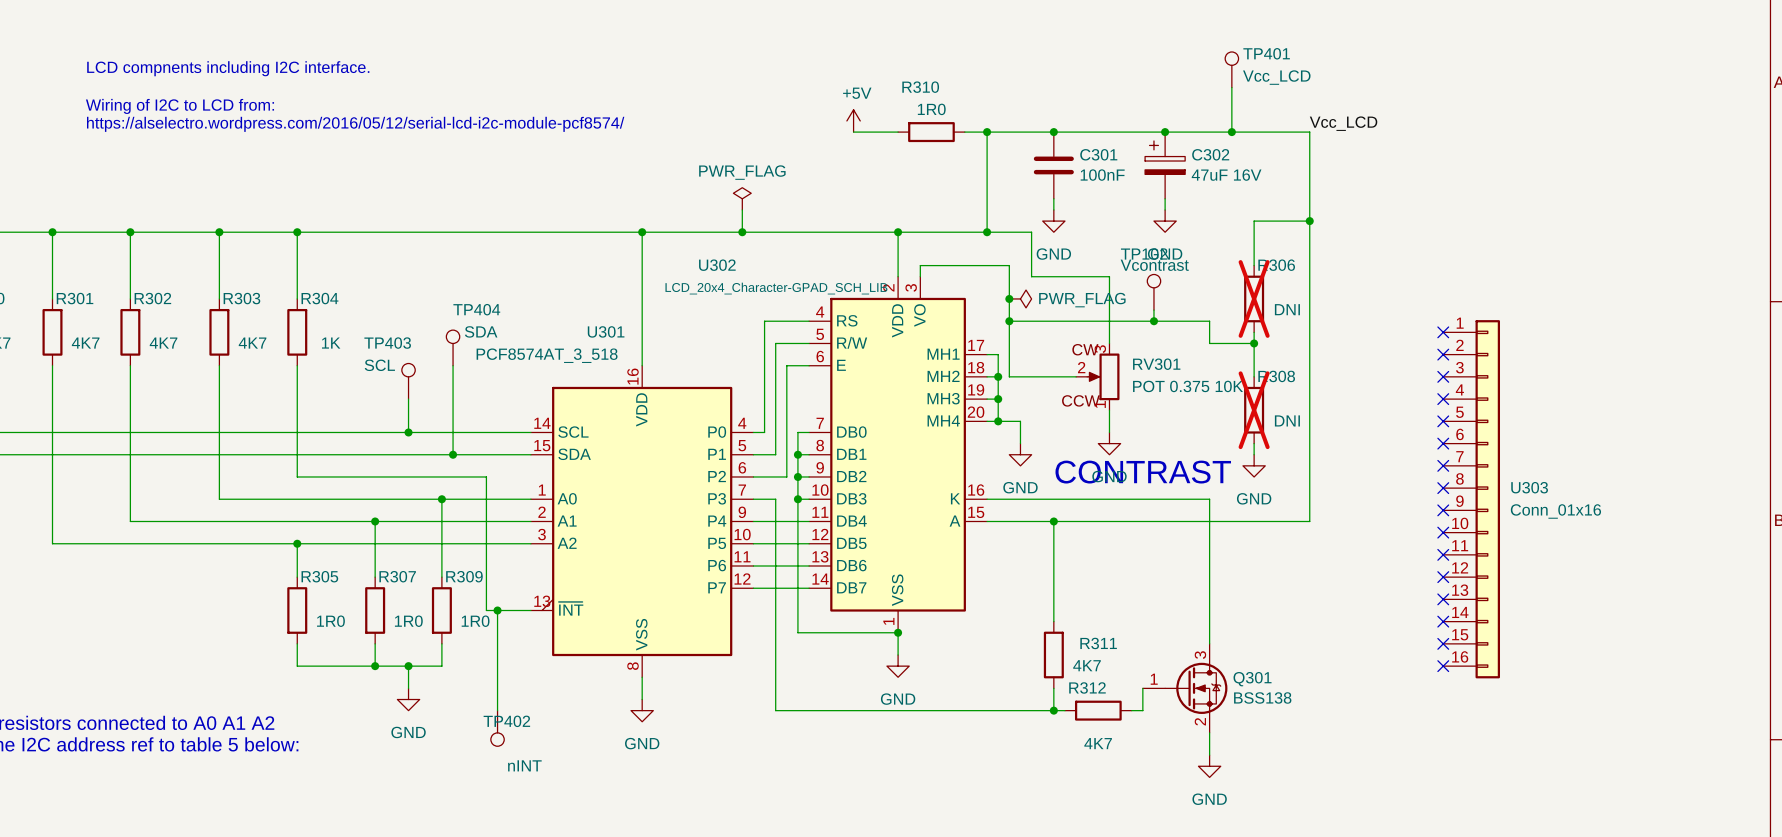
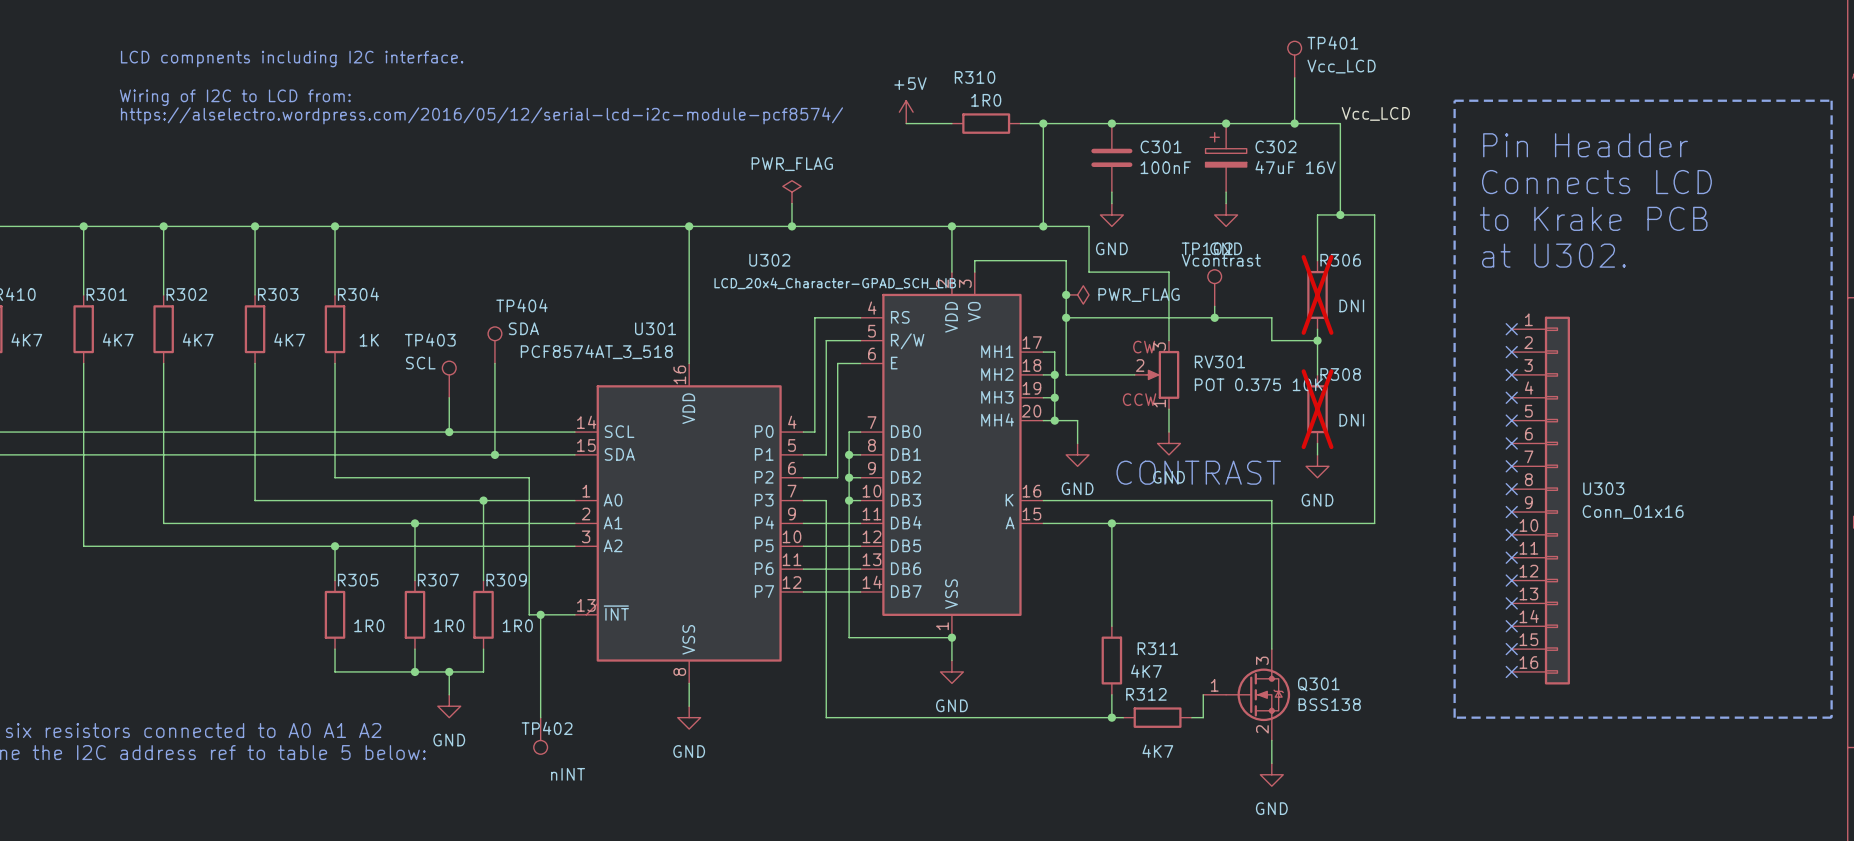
line: none -> (1454, 100) (1831, 100) (1831, 717) (1454, 717) (1454, 100)
label position: Vcc_LCD (1343, 123) -> Vcc_LCD (1375, 113)
wire: (1276, 132) (1309, 132) (1309, 221) -> (1340, 123) (1340, 214)
text: none -> Pin Headder (1585, 145)
text: none -> Connects LCD (1596, 182)
junction position: (1309, 221) -> (1340, 214)
text: none -> to Krake PCB (1593, 218)
text: none -> at U302. (1553, 255)

